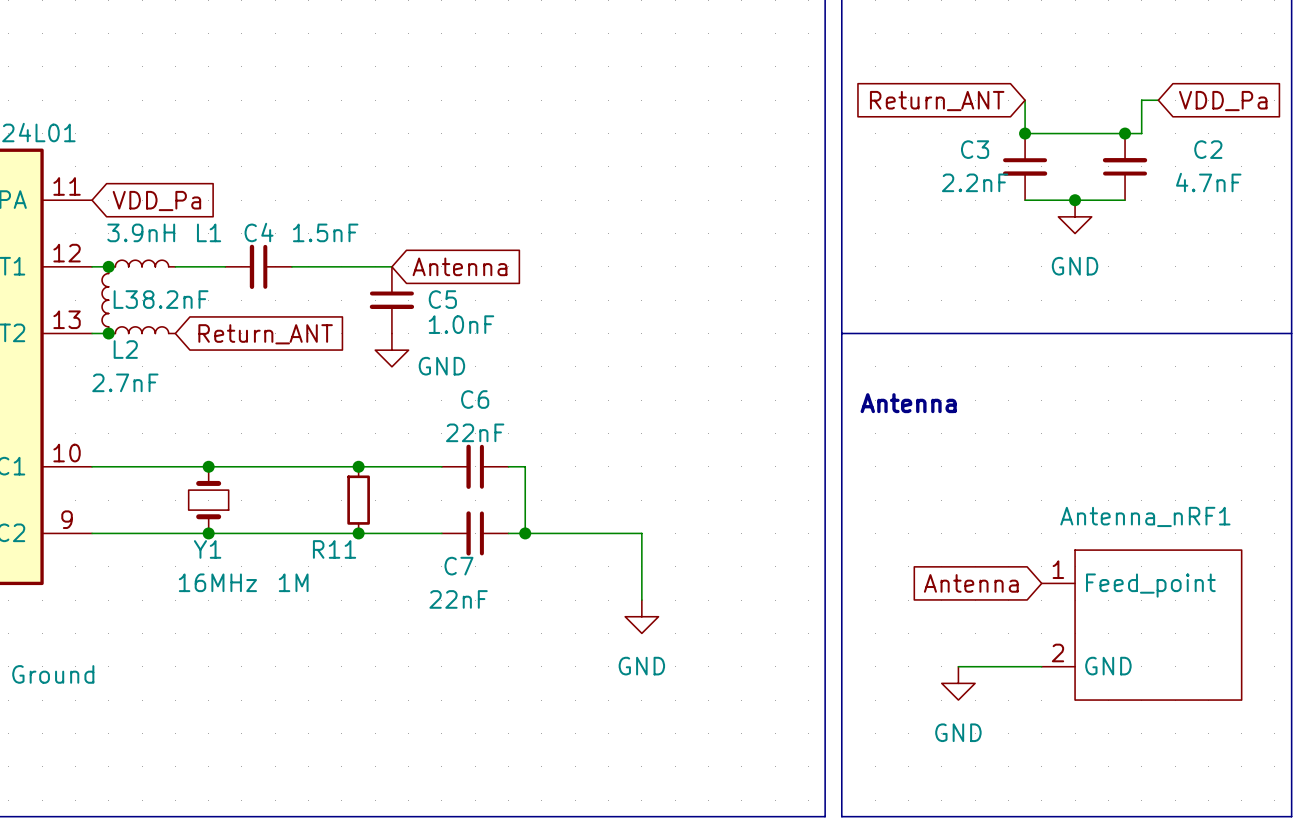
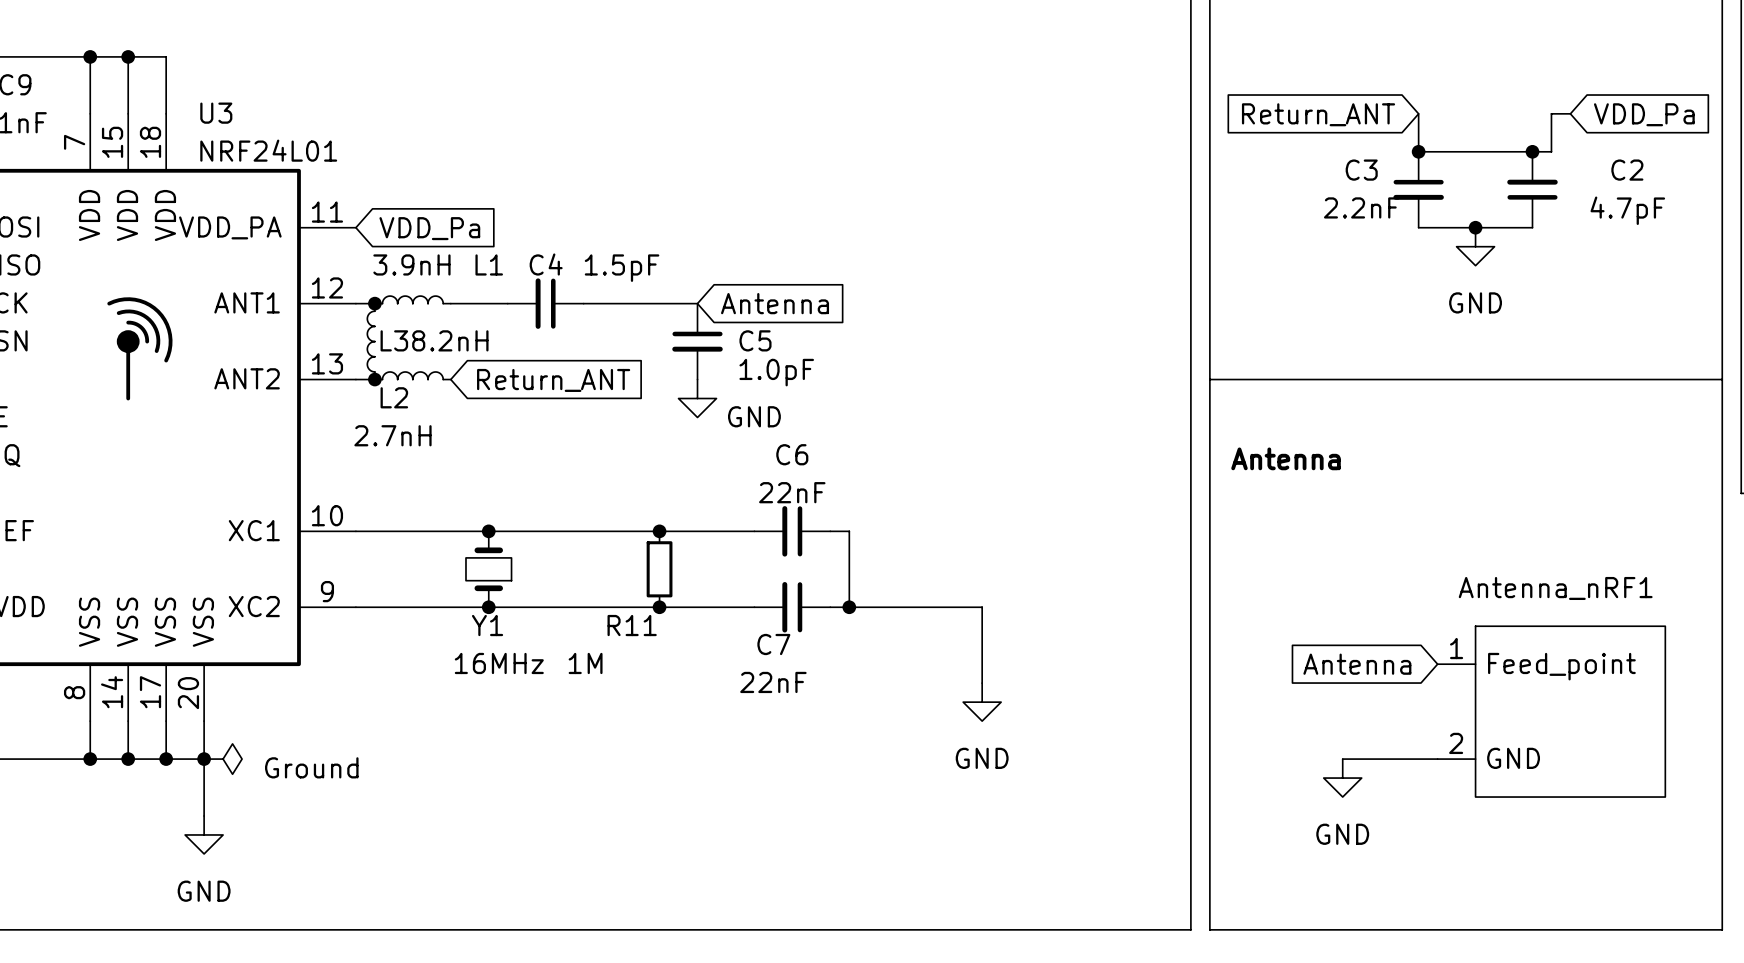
C2 value: 4.7nF (1208, 182) -> 4.7pF (1627, 210)
C4 value: 1.5nF (325, 232) -> 1.5pF (622, 268)
L3 value: 8.2nF (175, 299) -> 8.2nH (450, 340)
C5 value: 1.0nF (461, 324) -> 1.0pF (776, 372)
L2 value: 2.7nF (125, 382) -> 2.7nH (392, 435)

